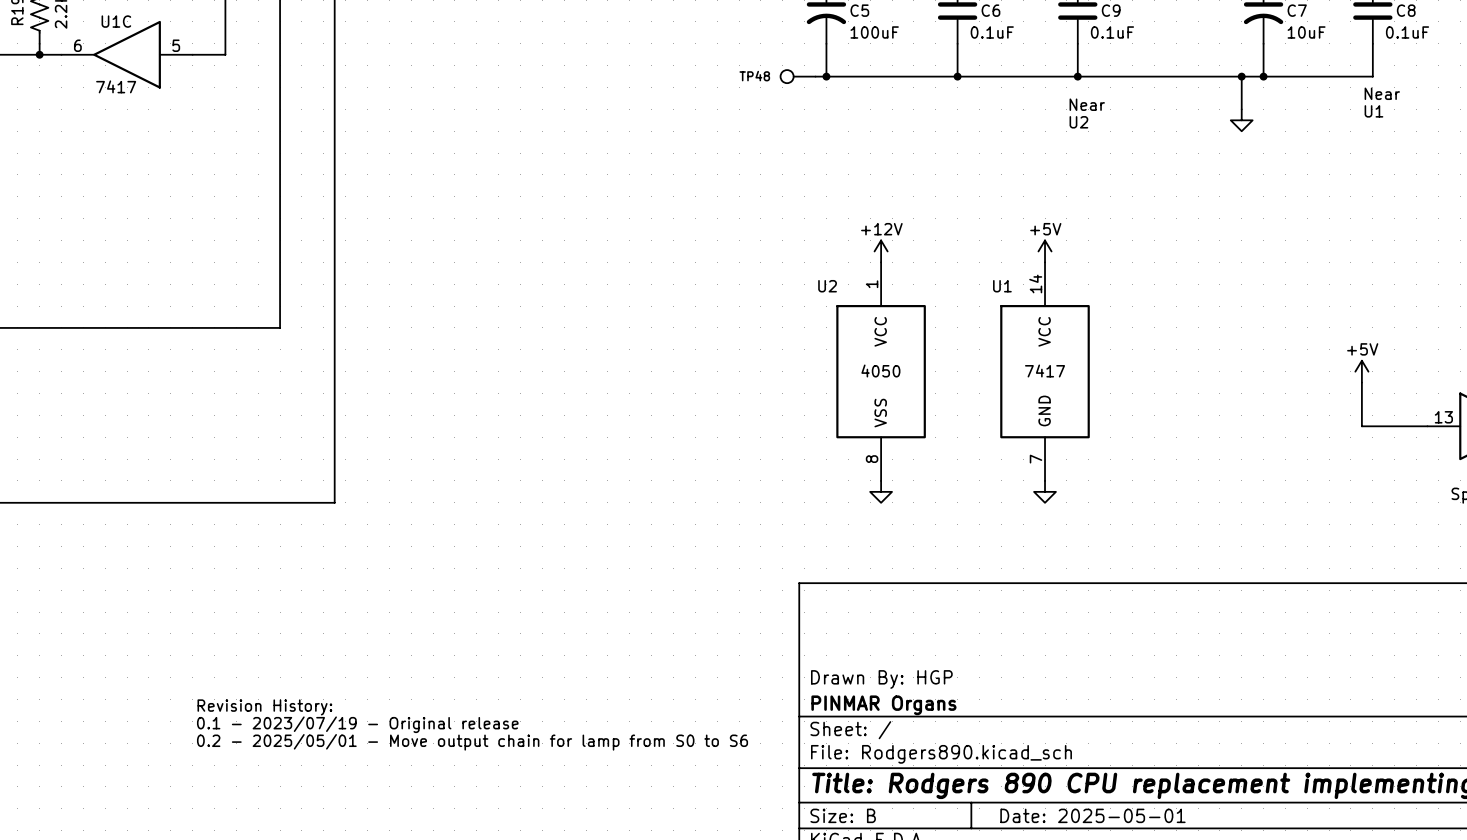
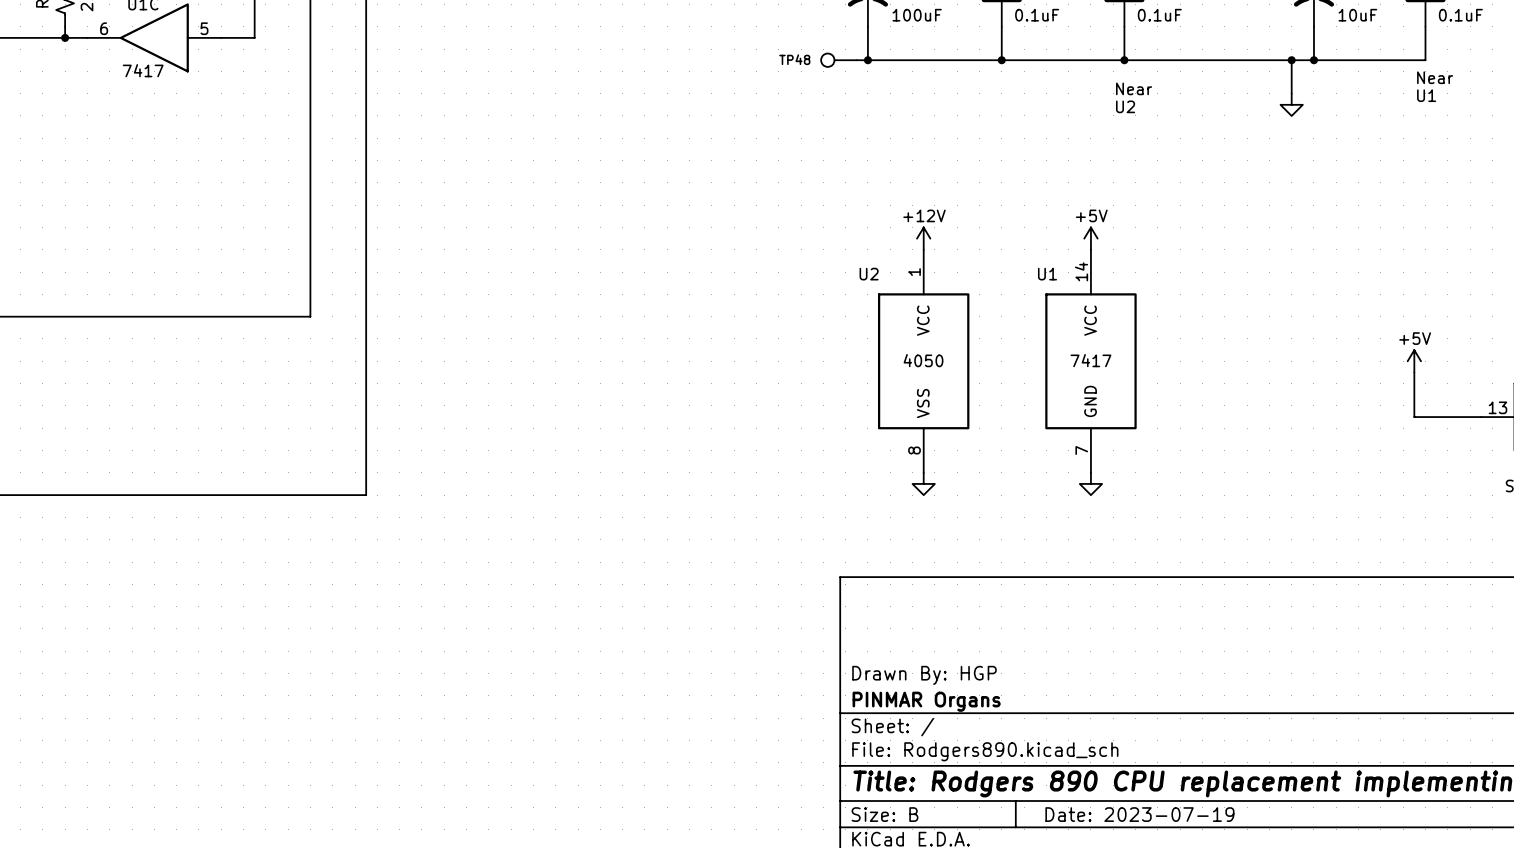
text: Revision History: (264, 707) -> none
text: 0.1 - 2023/07/19 - Original release (357, 724) -> none
text: 0.2 - 2025/05/01 - Move output chain for lamp from S0 to S6 (472, 742) -> none
title block: Date: 2025-05-01 (1092, 815) -> Date: 2023-07-19 (1139, 814)

